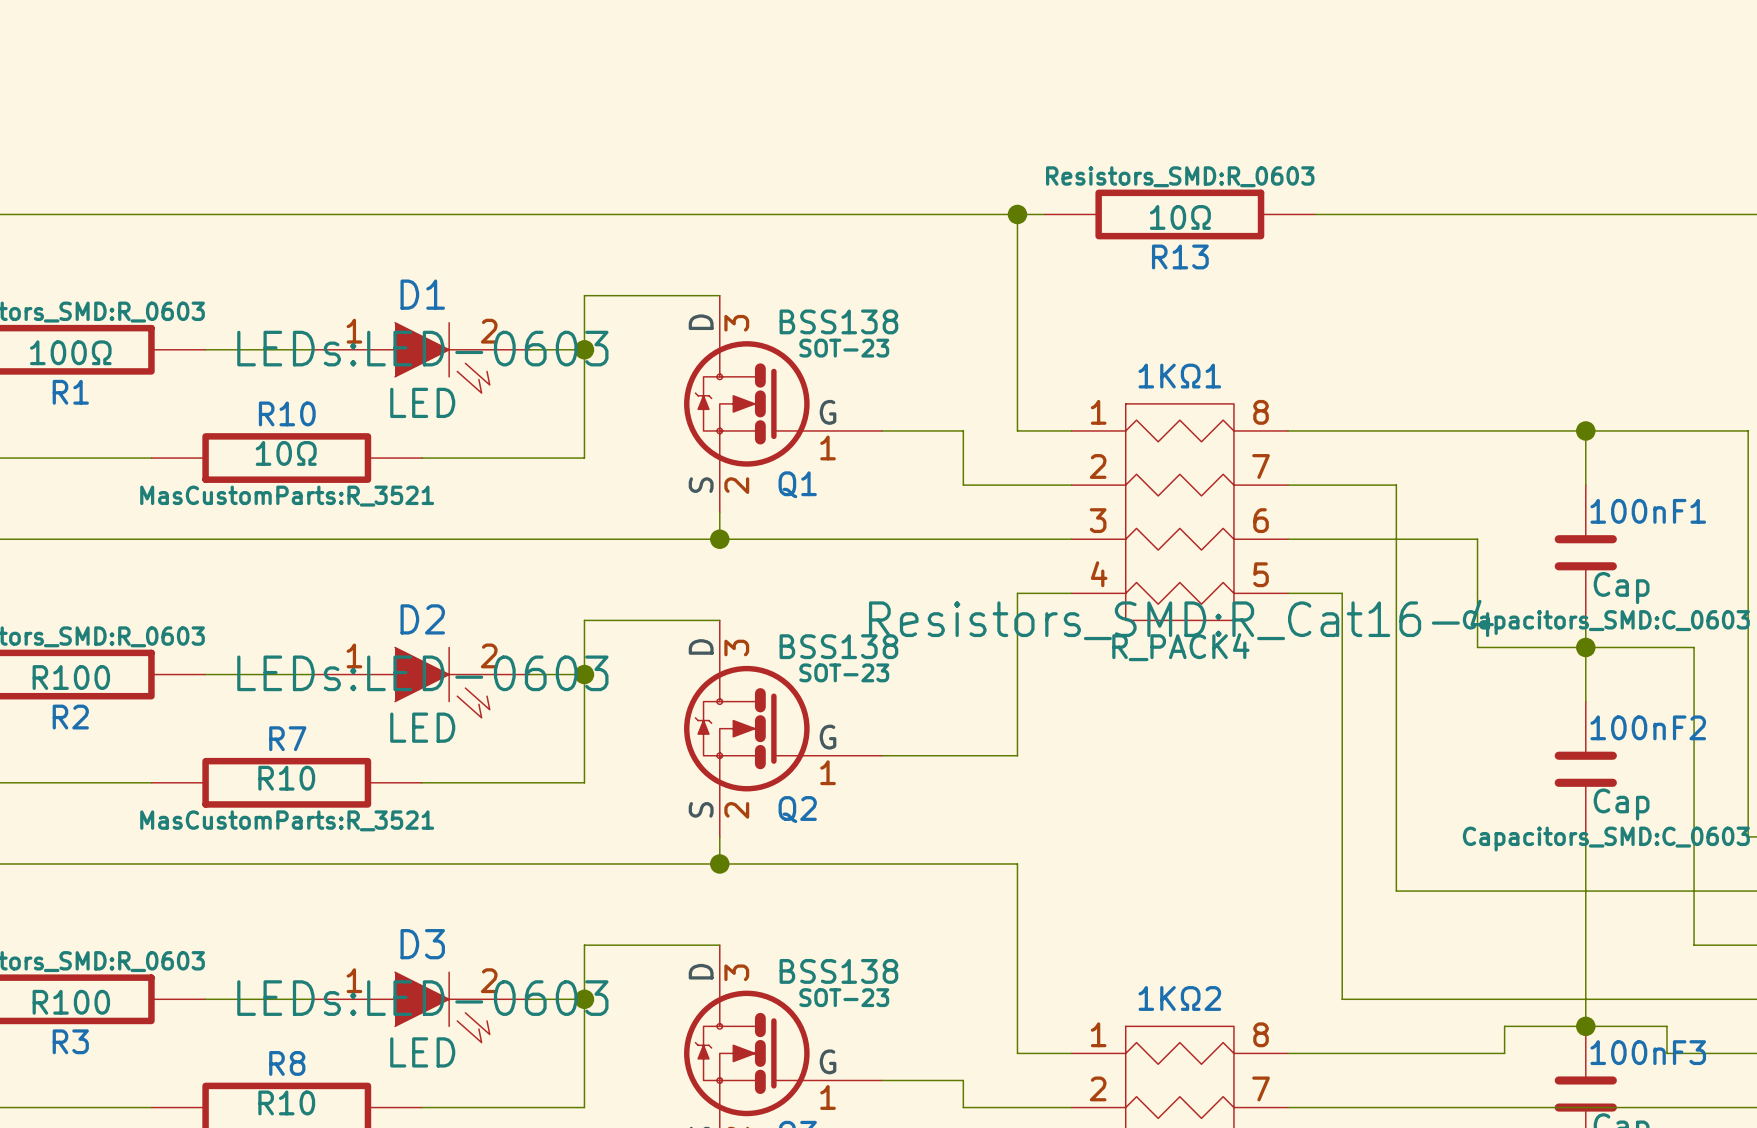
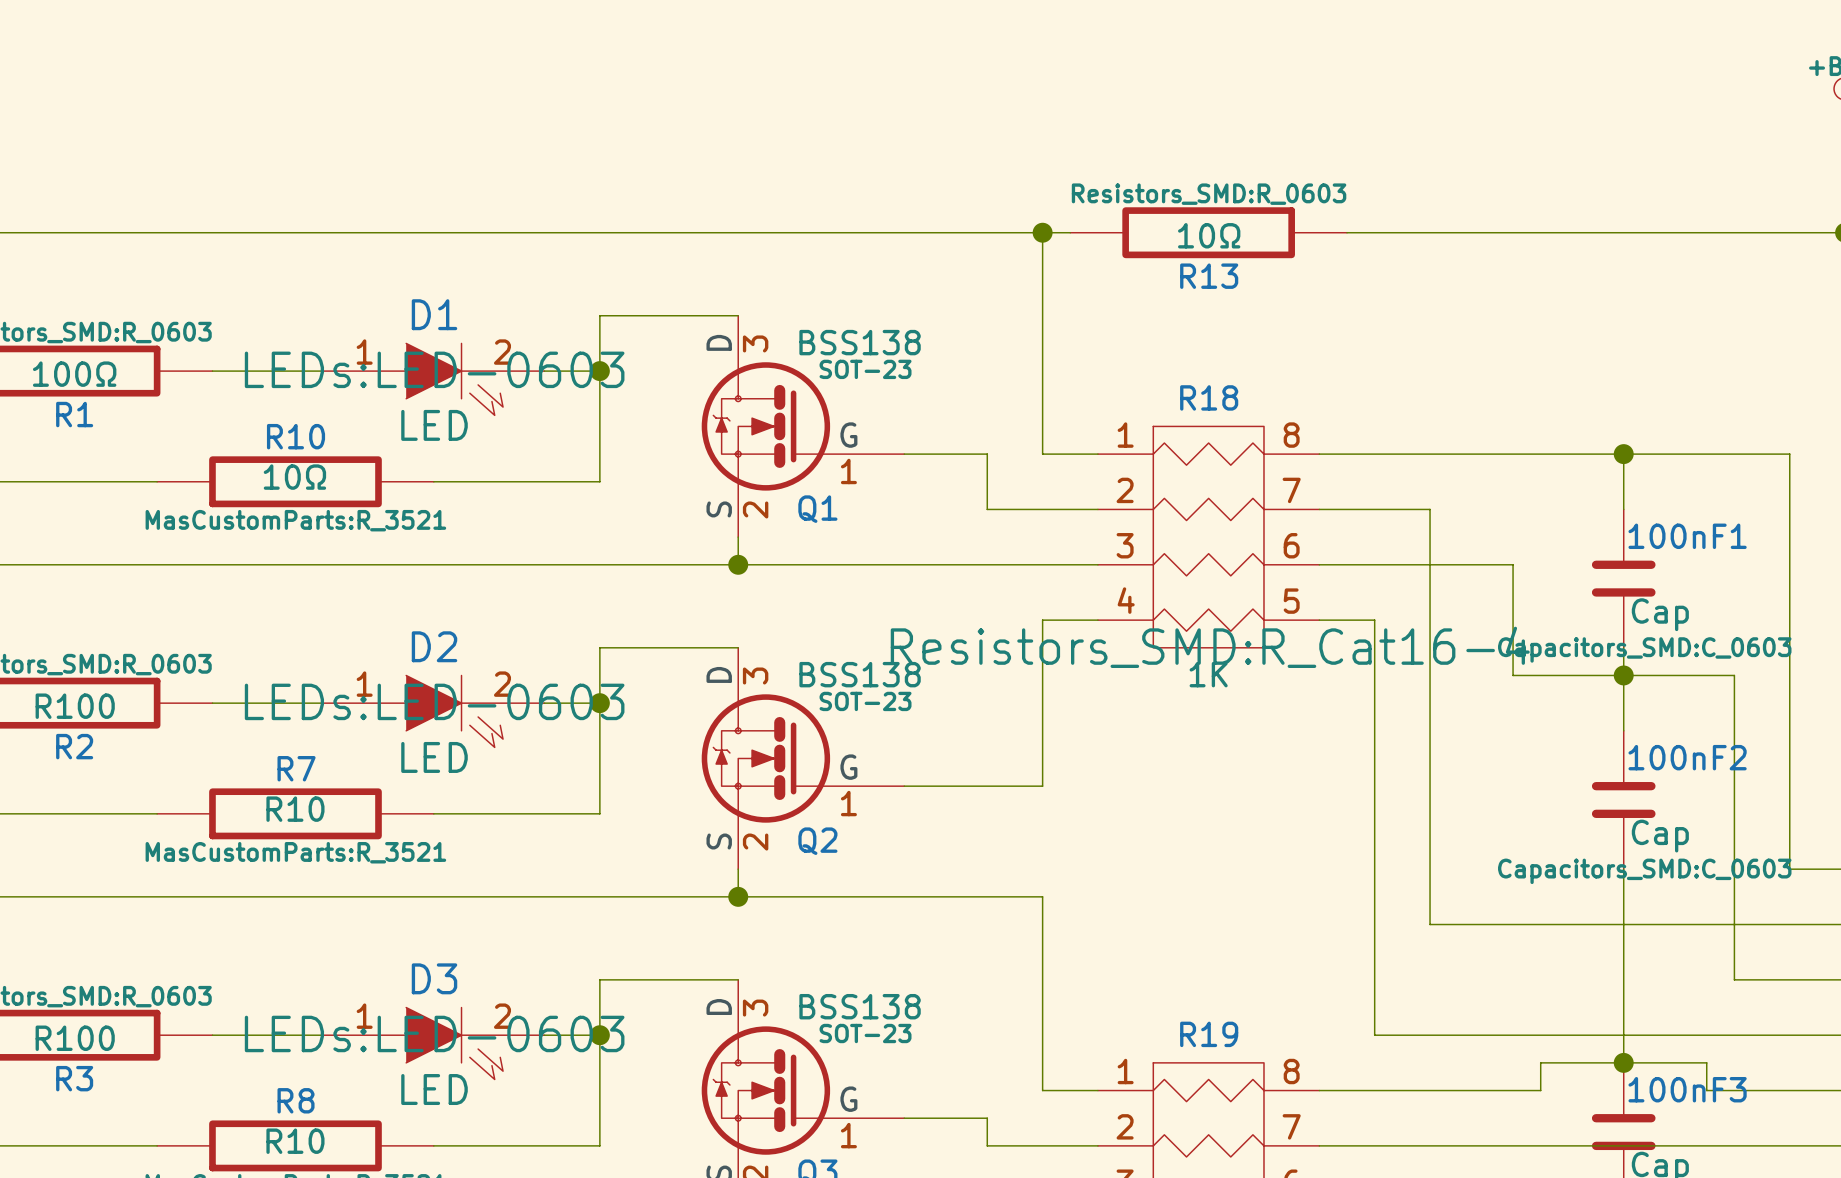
1KΩ1 name: 1KΩ1 (1179, 376) -> R18 (1209, 397)
1KΩ1 value: R_PACK4 (1180, 647) -> 1K (1208, 674)
1KΩ2 name: 1KΩ2 (1179, 998) -> R19 (1209, 1034)

